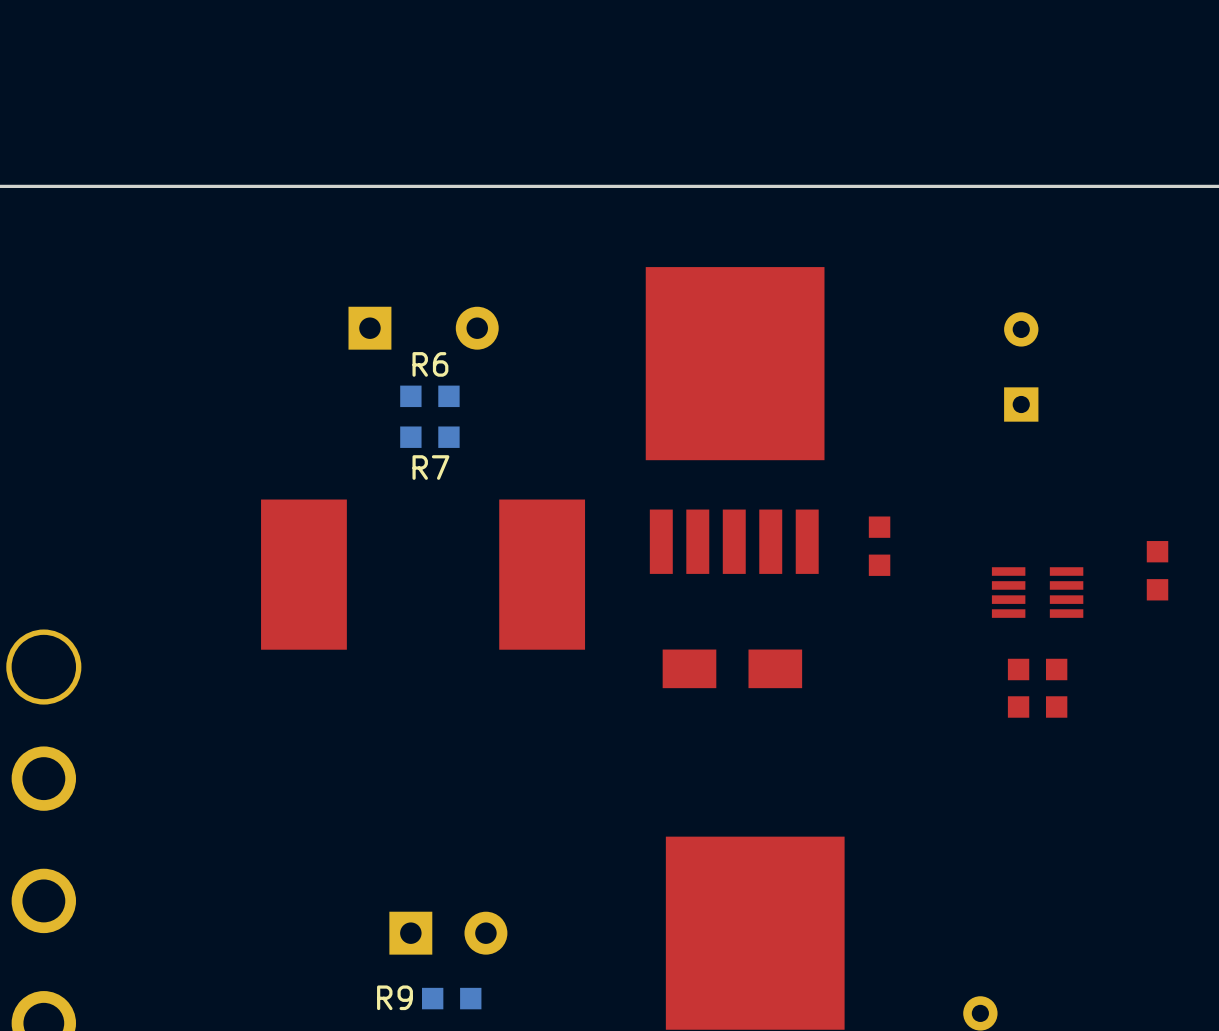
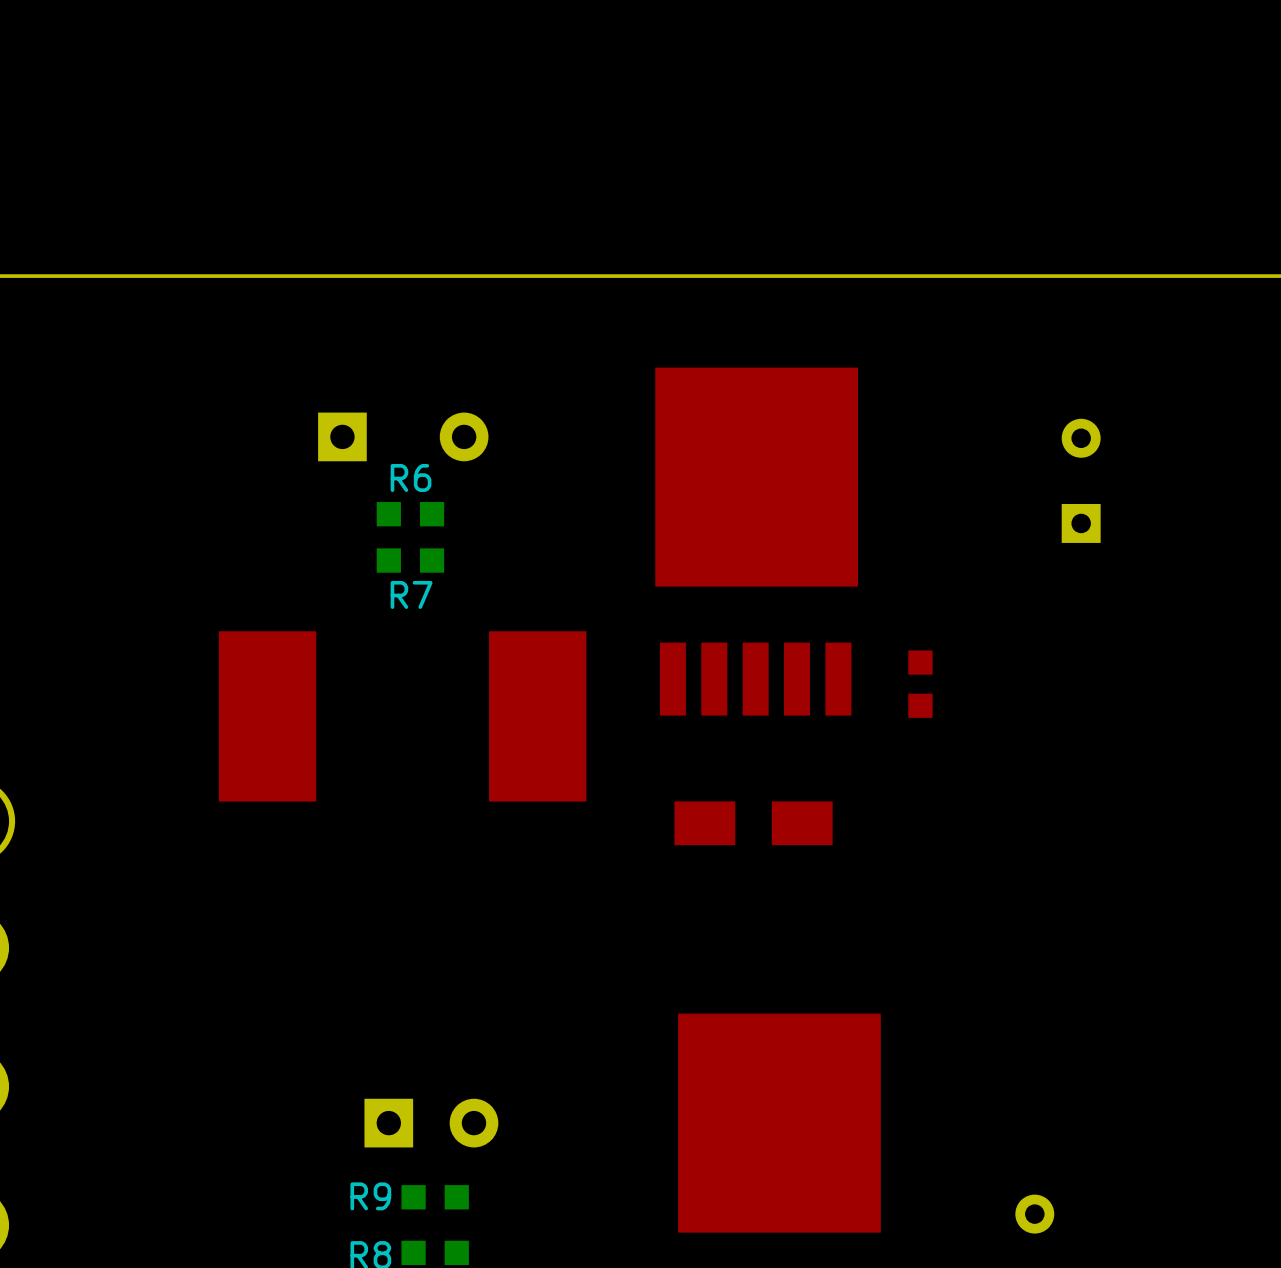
part: (1157, 570) -> none
part: (1037, 592) -> none
part: (1037, 669) -> none
part: (1037, 706) -> none

